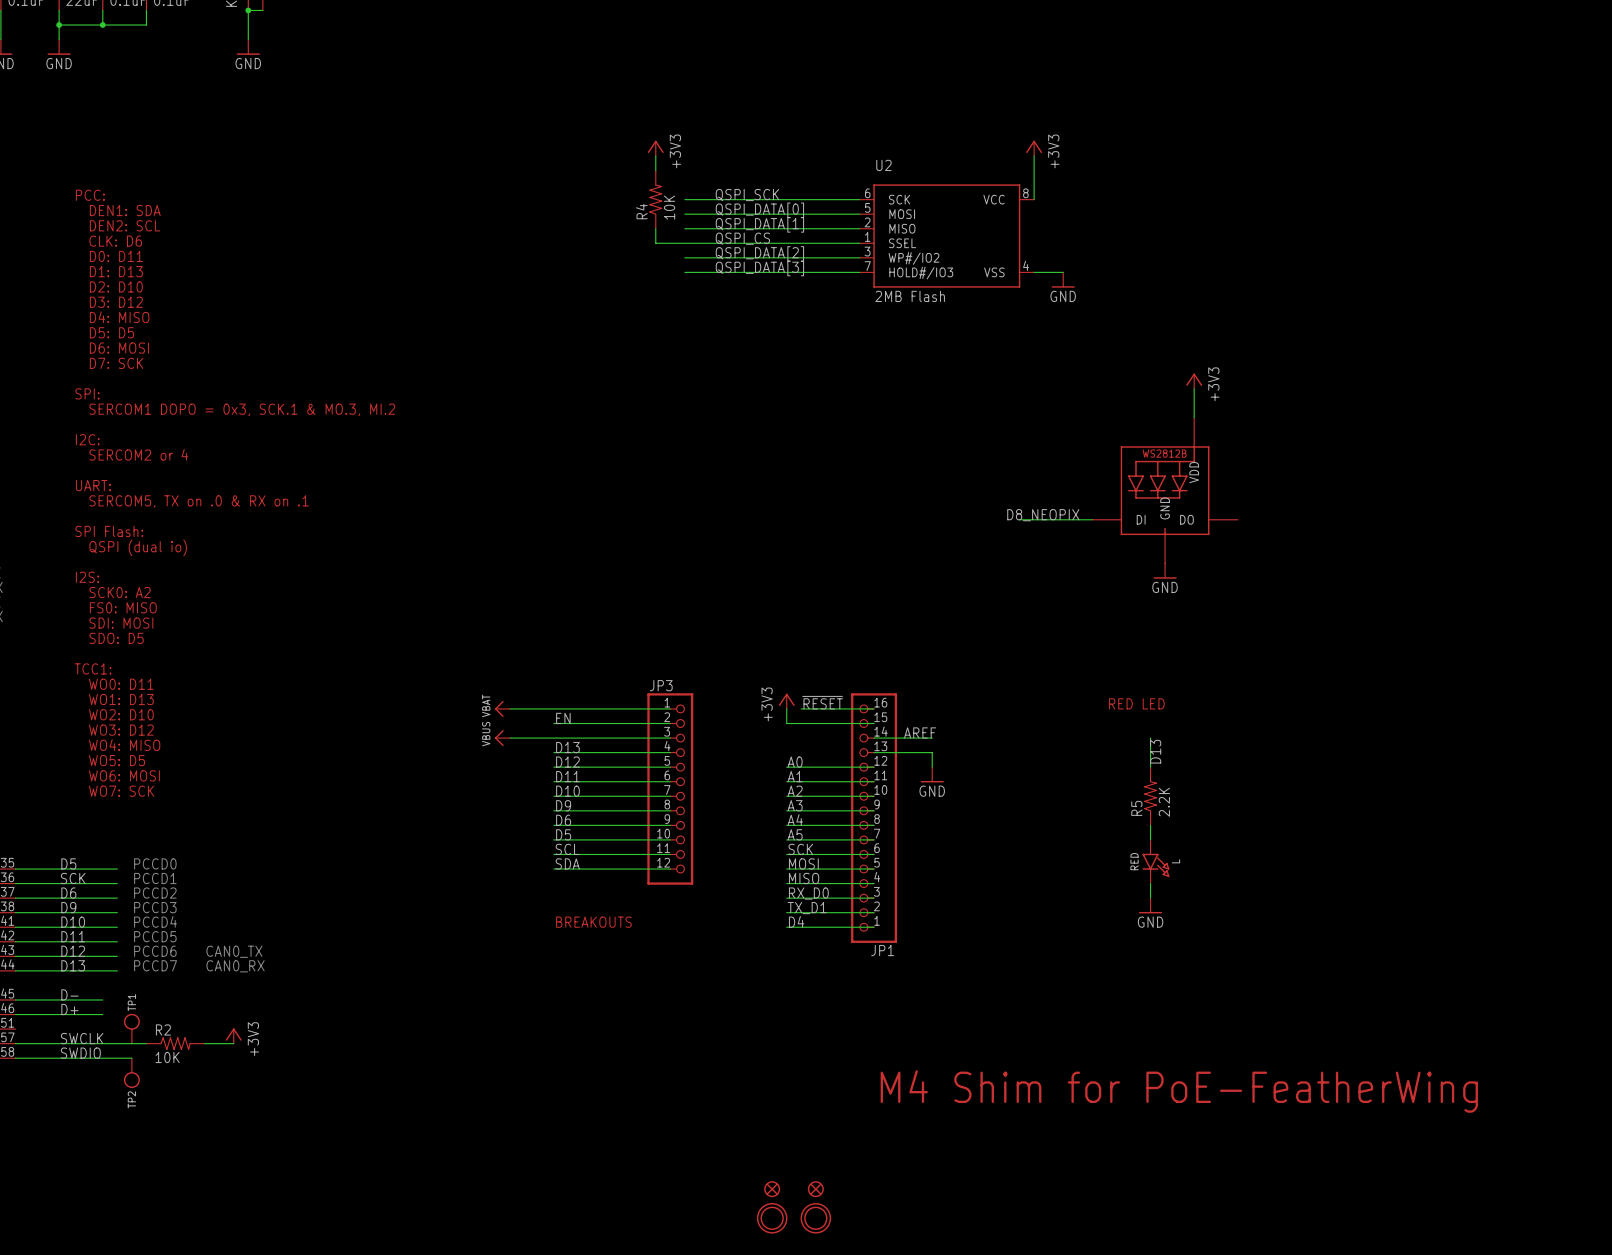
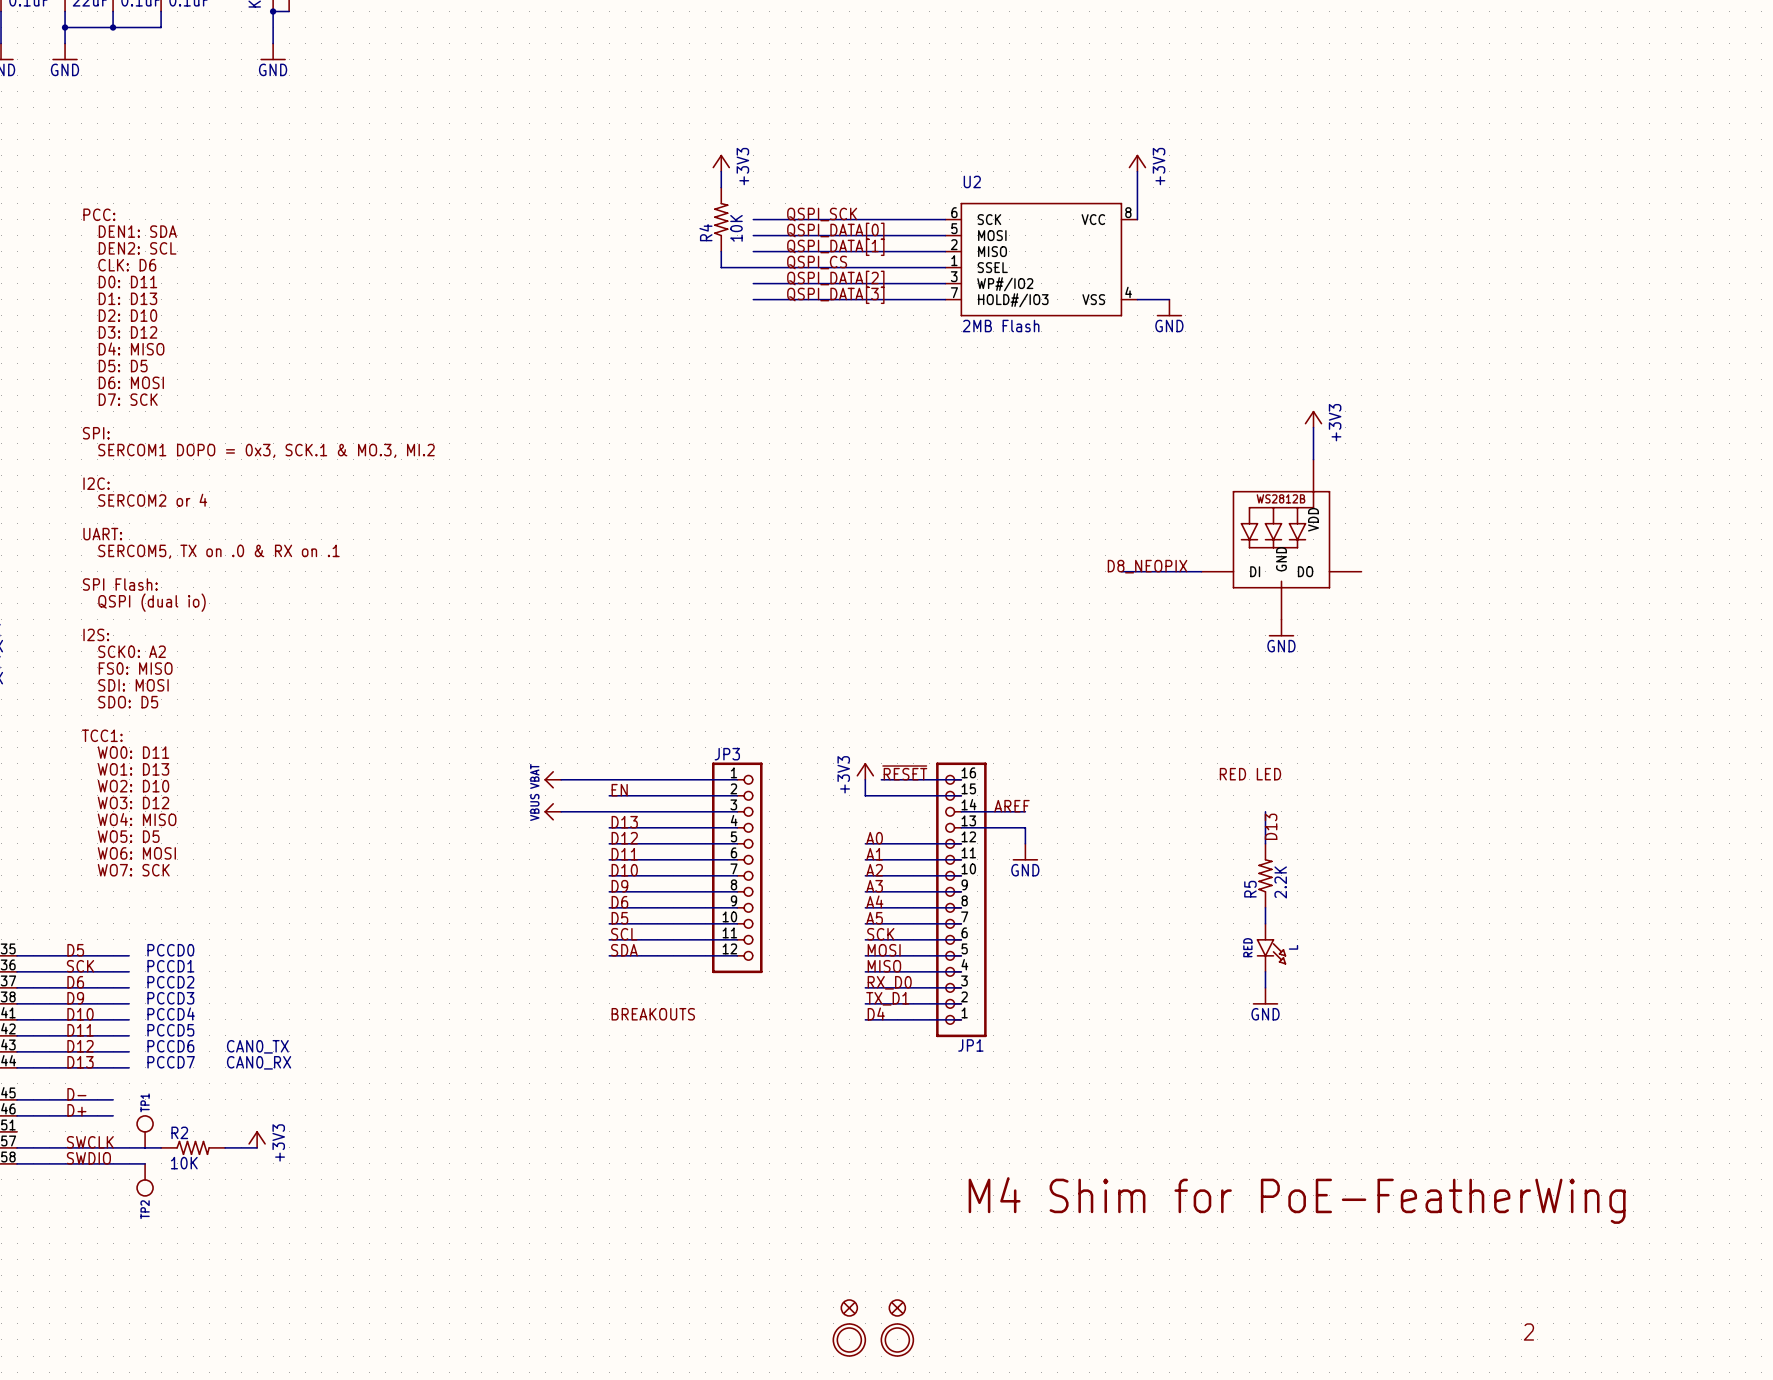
text: none -> 2 (1528, 1331)

